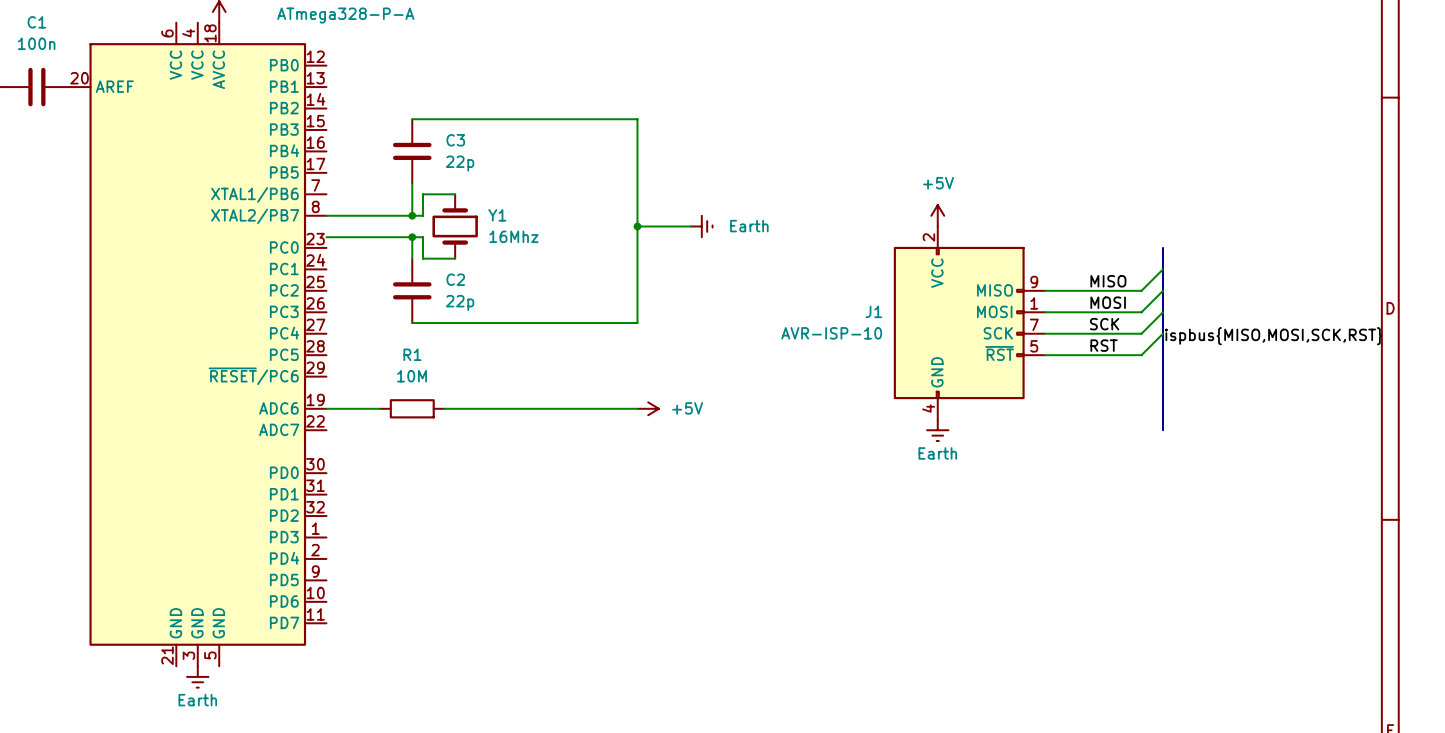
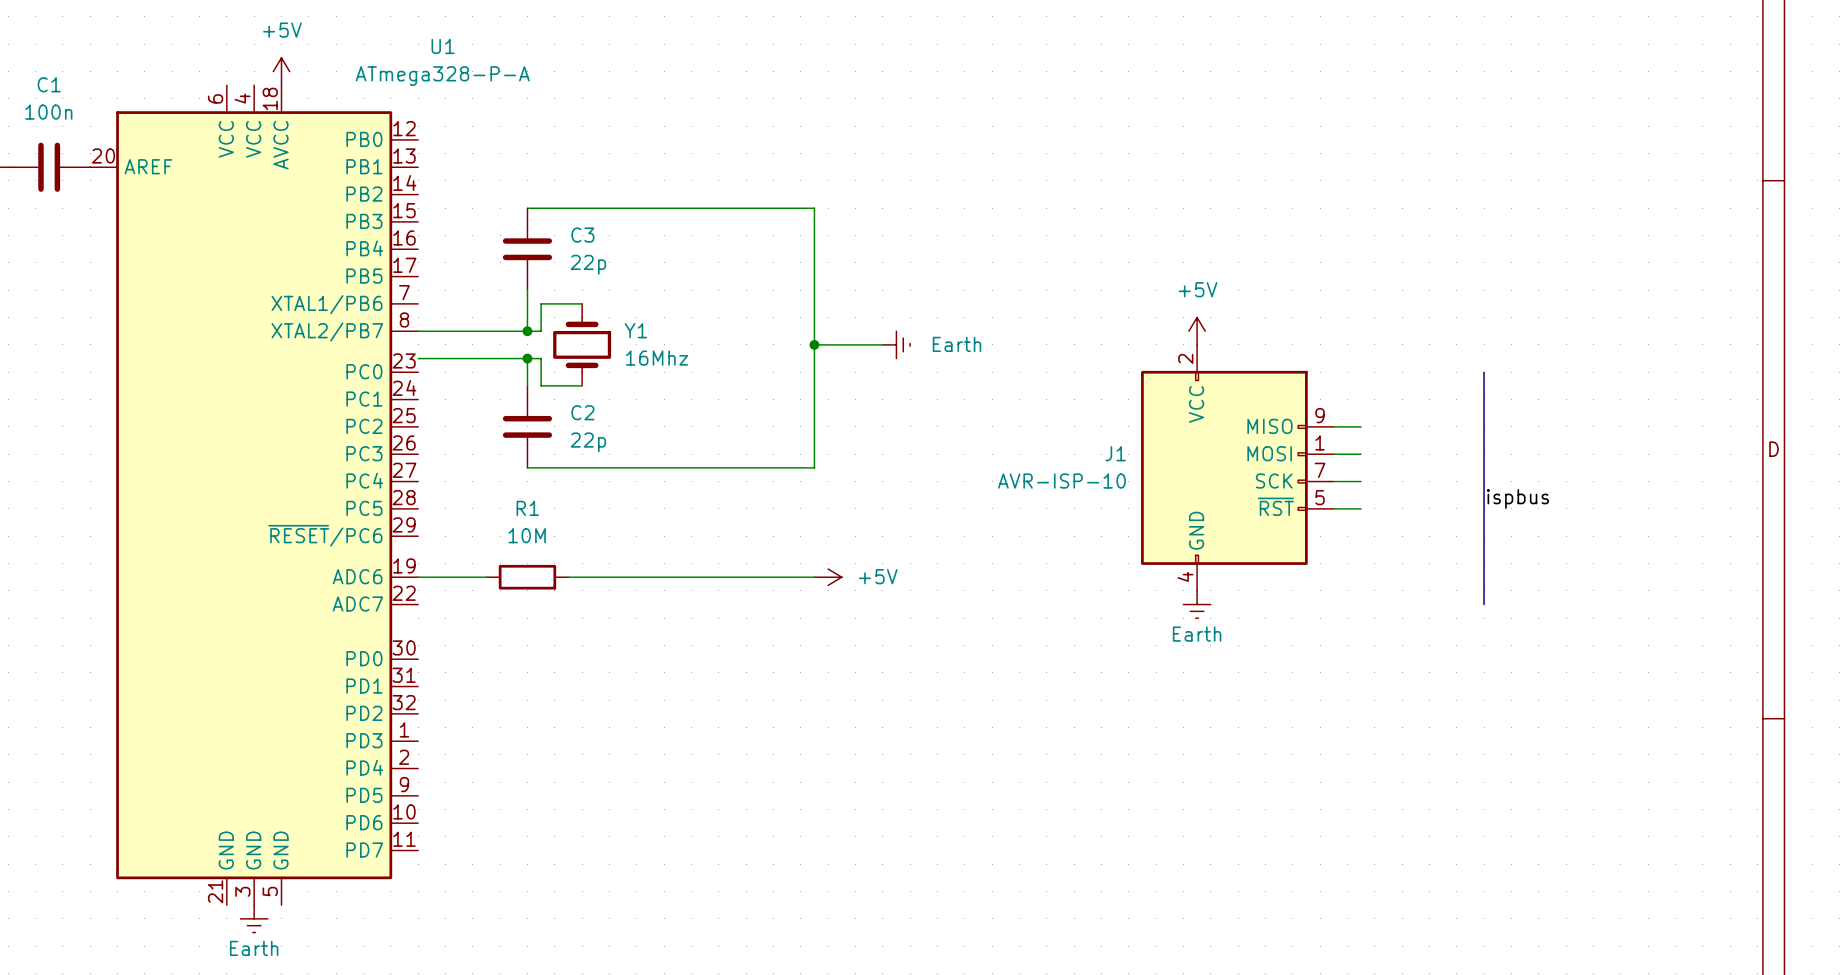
wire: (1162, 269) (1141, 290) (1066, 290) -> none
label: MISO (1108, 281) -> none
wire: (1162, 290) (1141, 312) (1066, 312) -> none
label: MOSI (1108, 302) -> none
wire: (1162, 312) (1141, 333) (1066, 333) -> none
label: SCK (1104, 324) -> none
wire: (1162, 333) (1141, 355) (1066, 355) -> none
label: ispbus{MISO,MOSI,SCK,RST} (1273, 336) -> none
label: RST (1104, 345) -> none
label: none -> ispbus (1517, 498)

